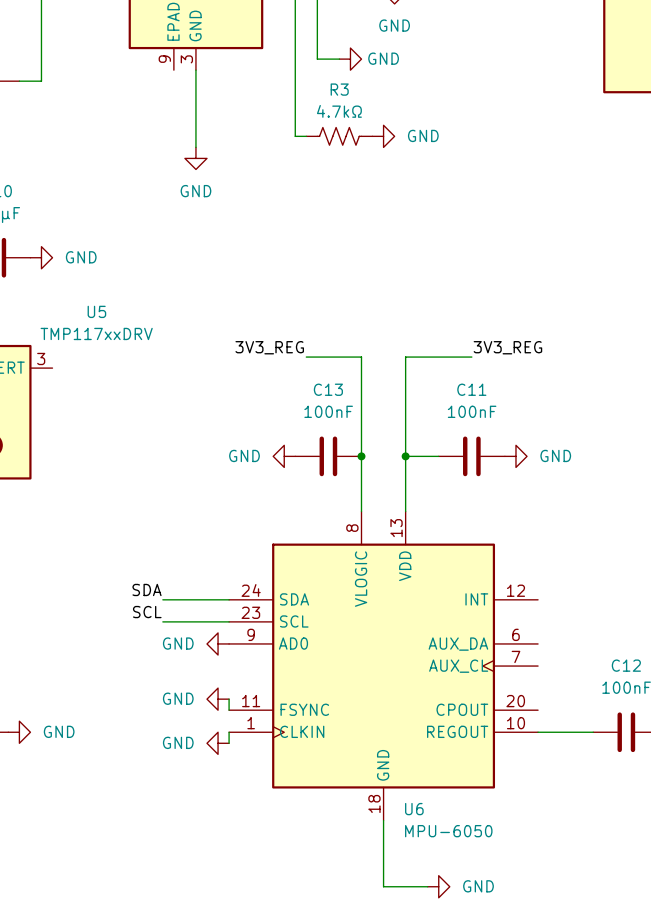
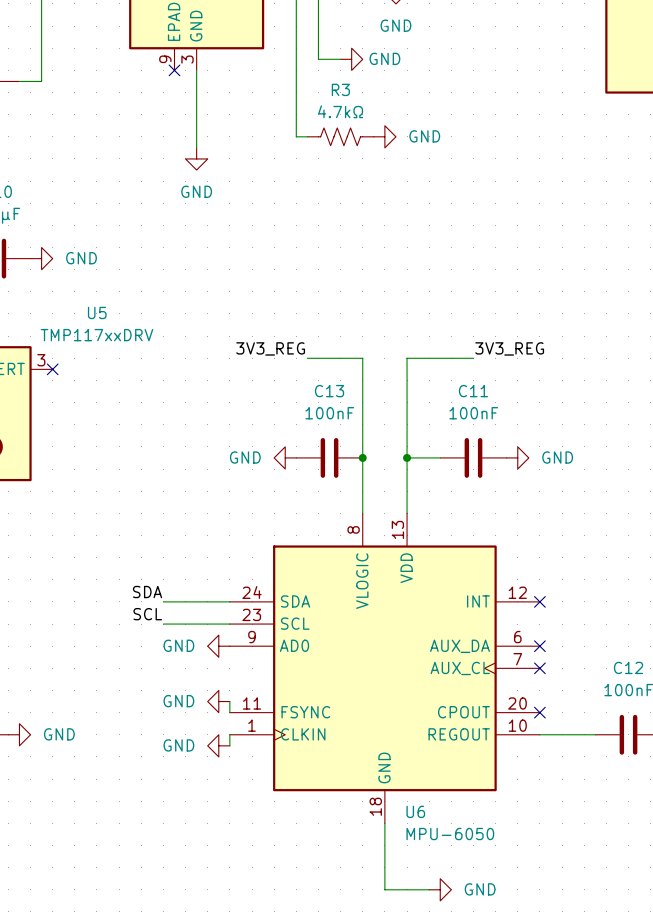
no-connect mark: none -> (174, 70)
no-connect mark: none -> (52, 369)
no-connect mark: none -> (539, 601)
no-connect mark: none -> (539, 646)
no-connect mark: none -> (539, 668)
no-connect mark: none -> (539, 712)

